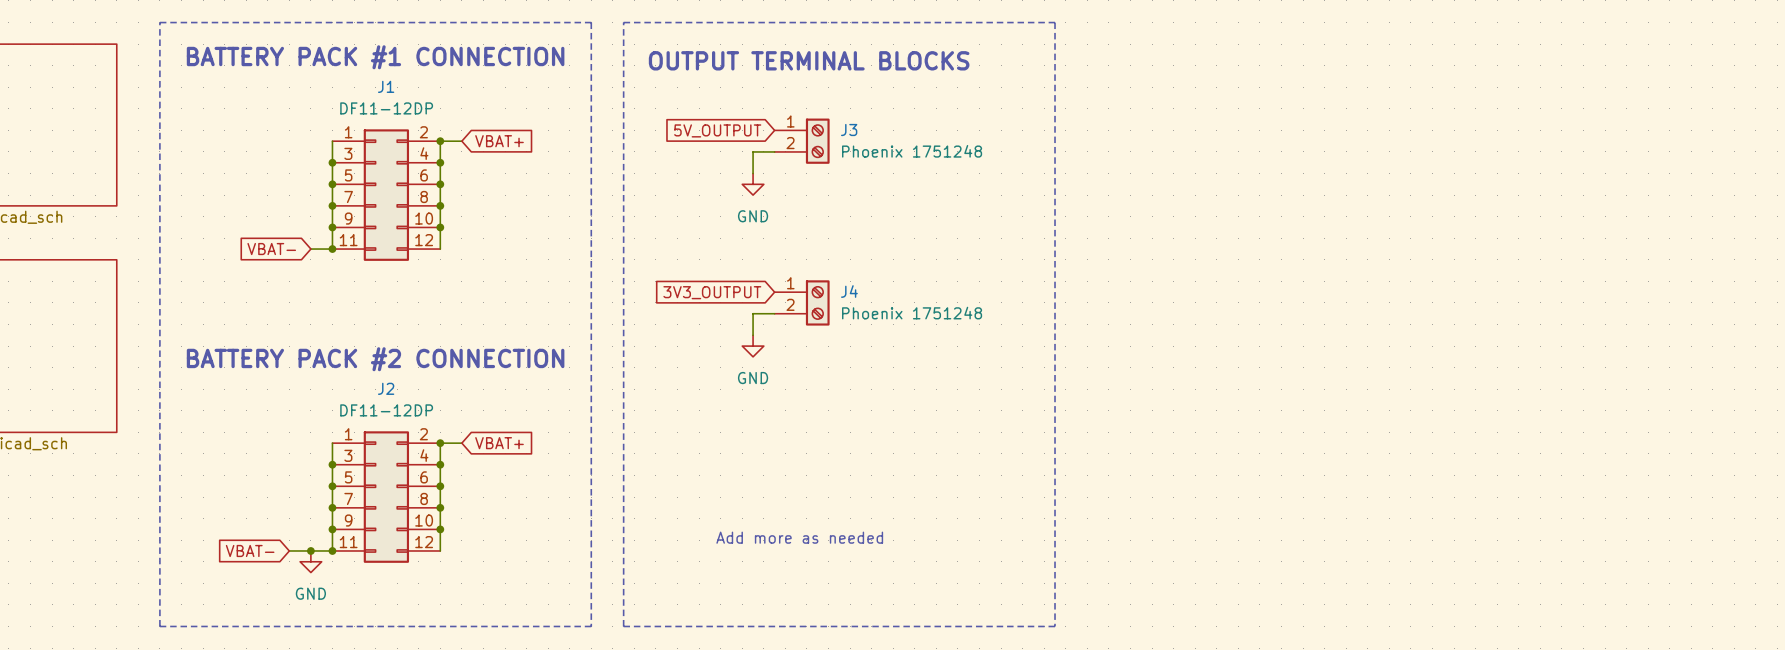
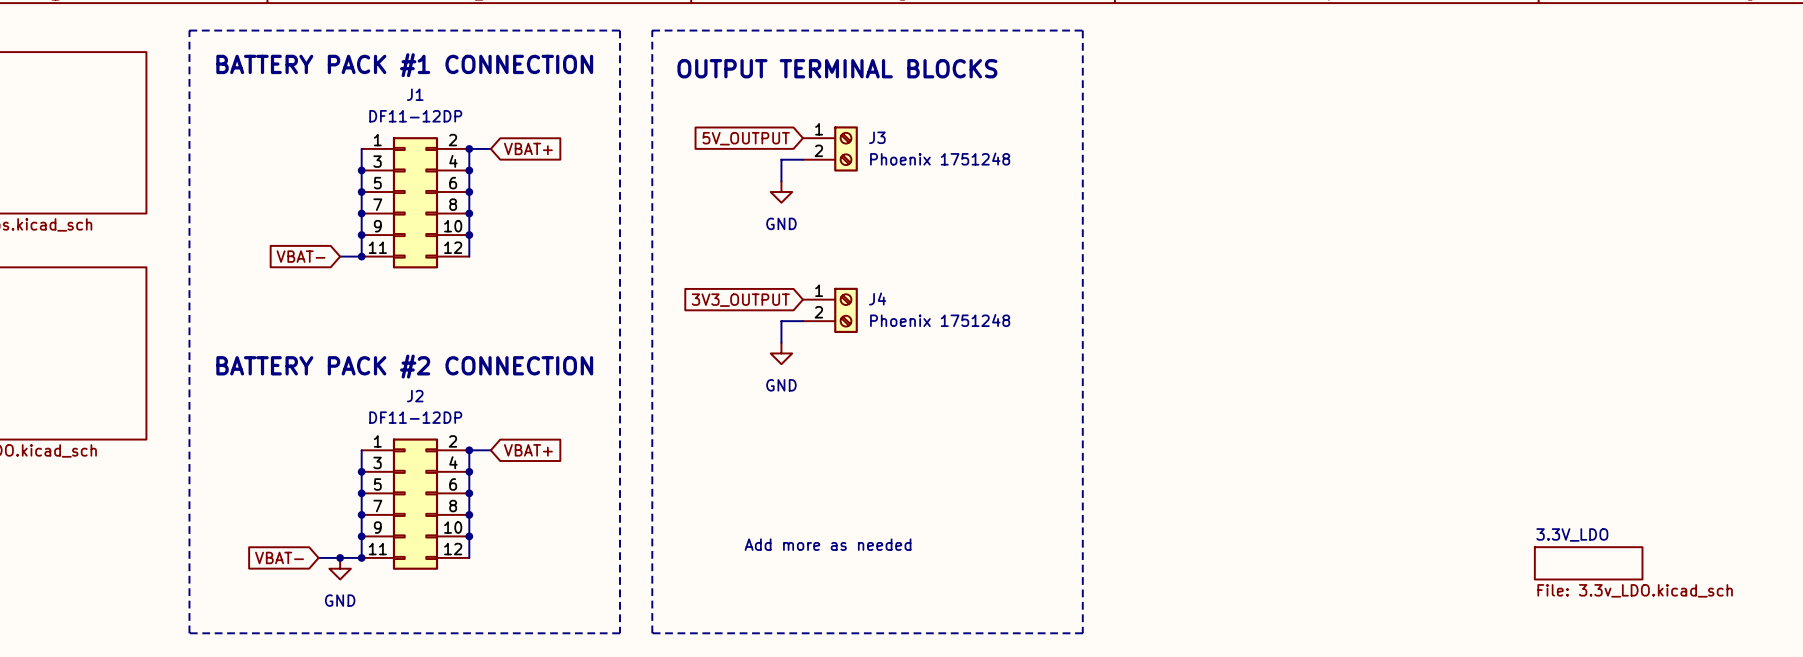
sheet 3.3V_LDO: none -> File: 3.3v_LDO.kicad_sch (1588, 563)

